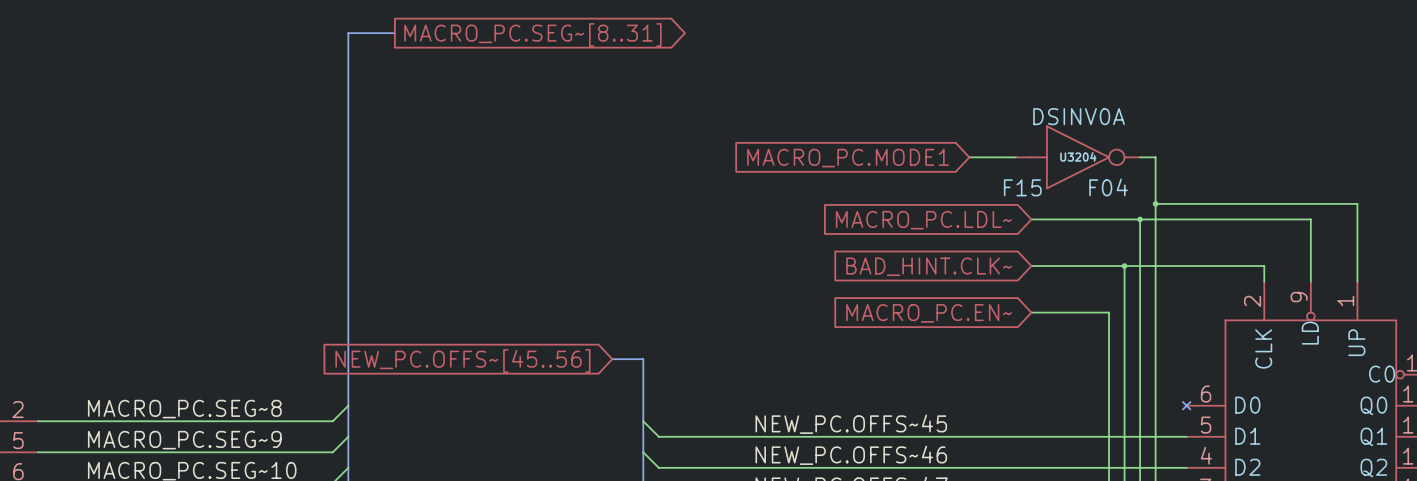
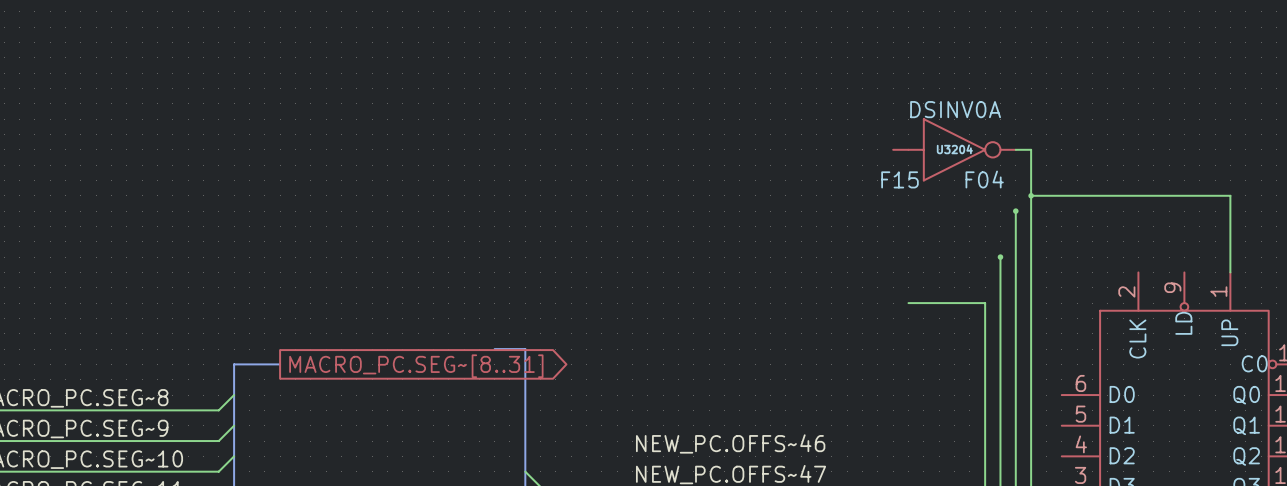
bus: (394, 33) (348, 33) (348, 374) -> (280, 364) (234, 364)
global label: MACRO_PC.SEG~[8..31] (532, 35) -> none
wire: (969, 157) (1015, 157) -> none
global label: MACRO_PC.MODE1 (848, 158) -> none
wire: (1031, 219) (1310, 219) (1310, 281) -> none
global label: MACRO_PC.LDL~ (923, 220) -> none
global label: BAD_HINT.CLK~ (929, 266) -> none
wire: (1031, 266) (1264, 266) (1264, 281) -> none
global label: MACRO_PC.EN~ (929, 313) -> none
global label: NEW_PC.OFFS~[45..56] (462, 361) -> none
global label: none -> MACRO_PC.SEG~[8..31] (416, 366)
no-connect mark: (1186, 405) -> none
wire: (643, 421) (658, 436) (1186, 436) -> none
label: NEW_PC.OFFS~45 (851, 424) -> none
wire: (643, 452) (658, 467) (1186, 467) -> none

